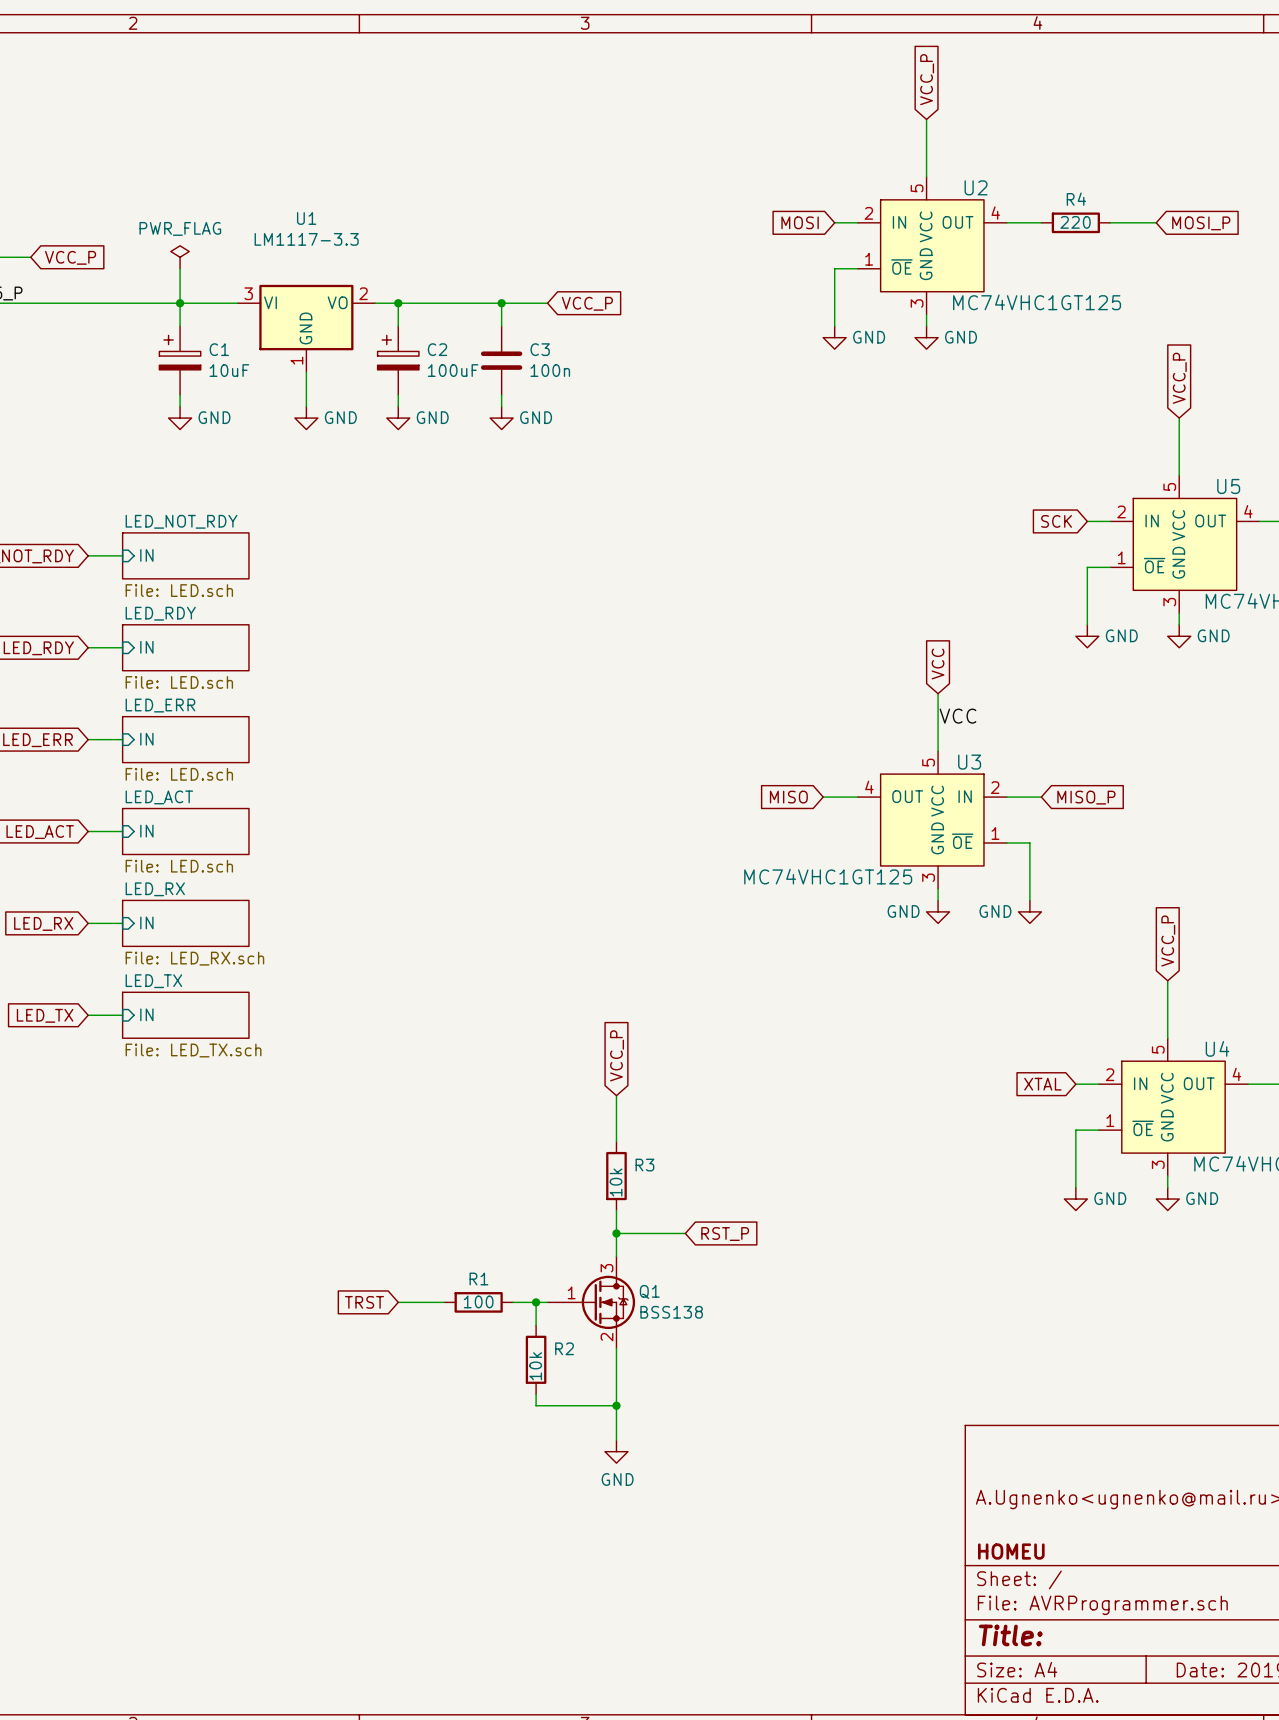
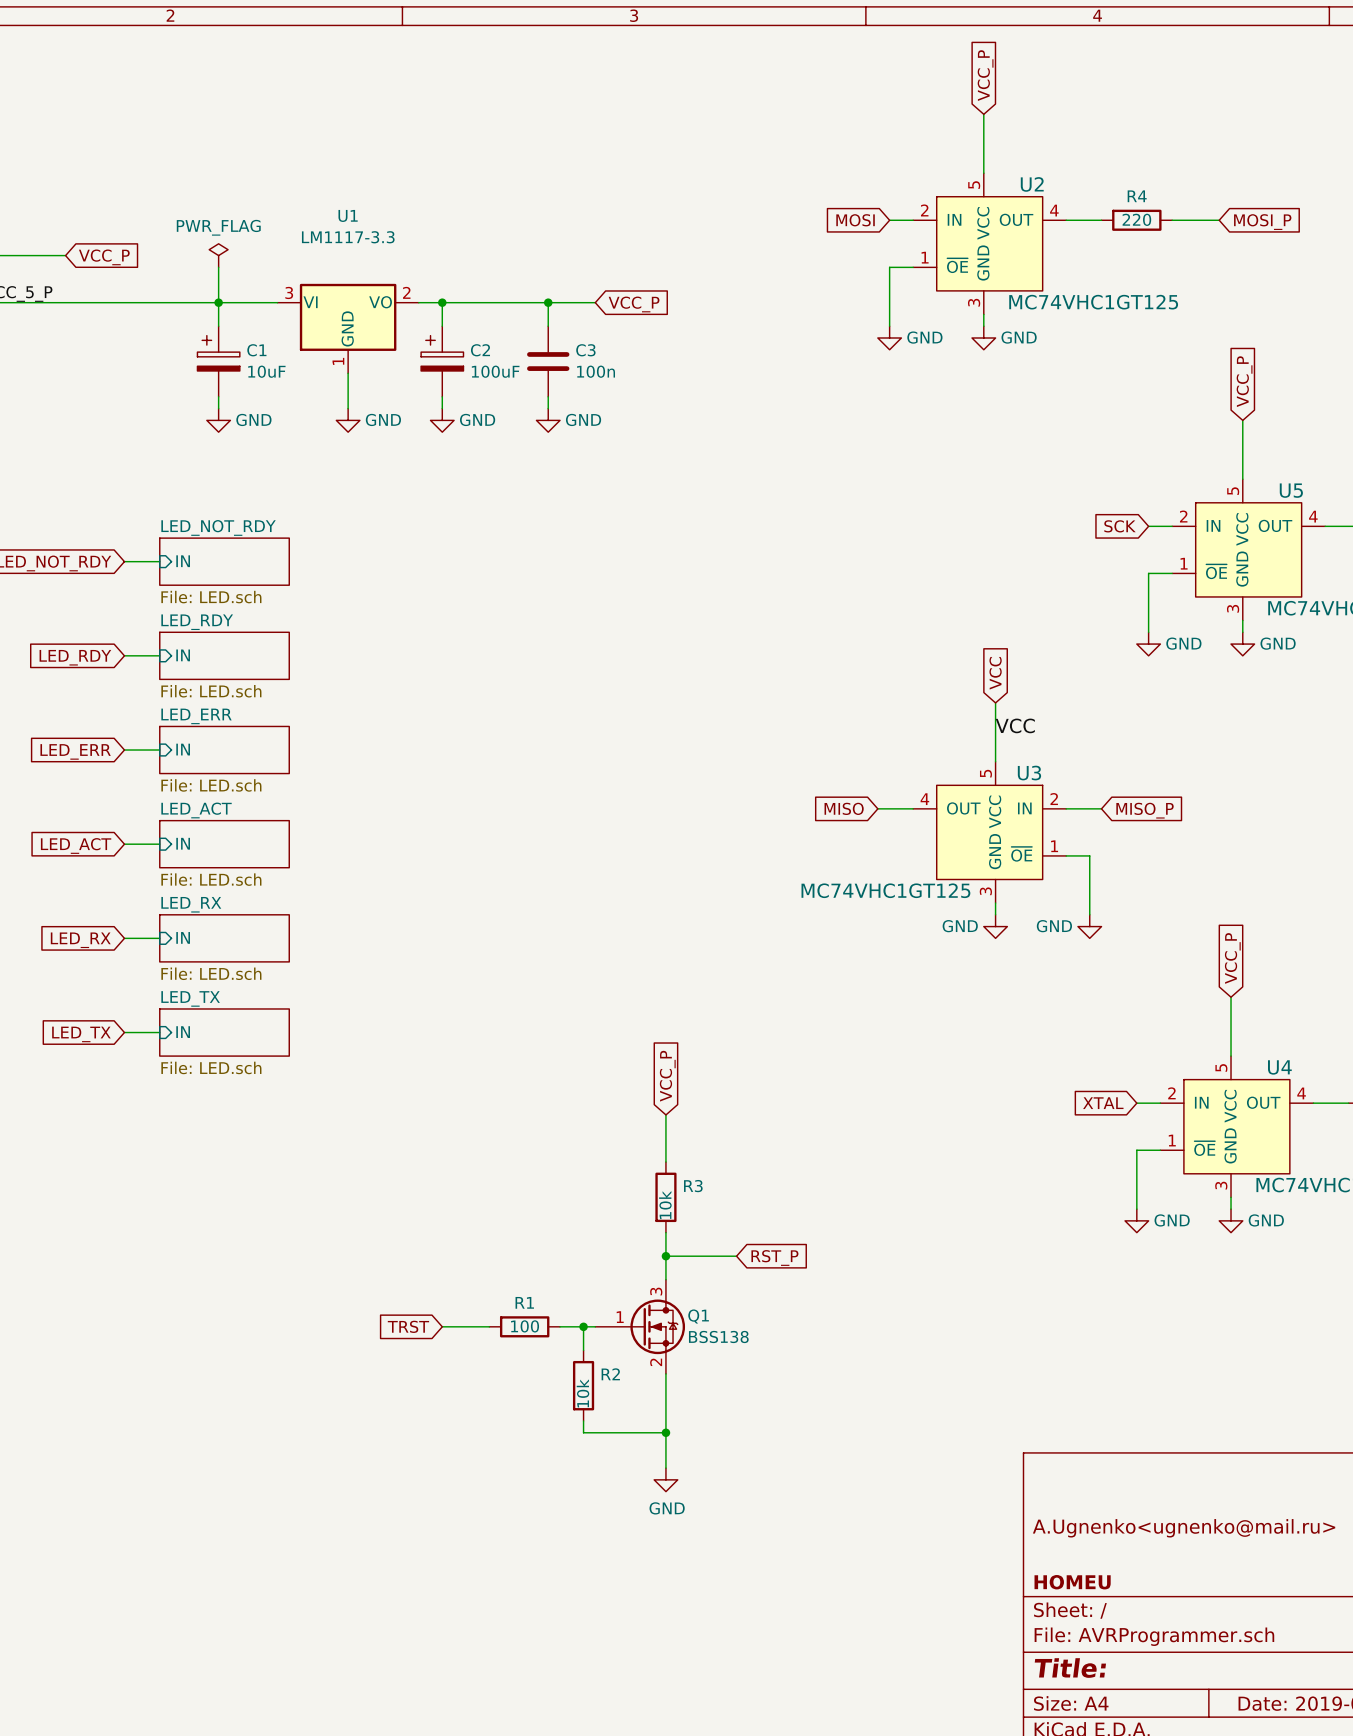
sheet LED_RX value: File: LED_RX.sch (194, 958) -> File: LED.sch (211, 973)
sheet LED_TX value: File: LED_TX.sch (193, 1050) -> File: LED.sch (211, 1067)

